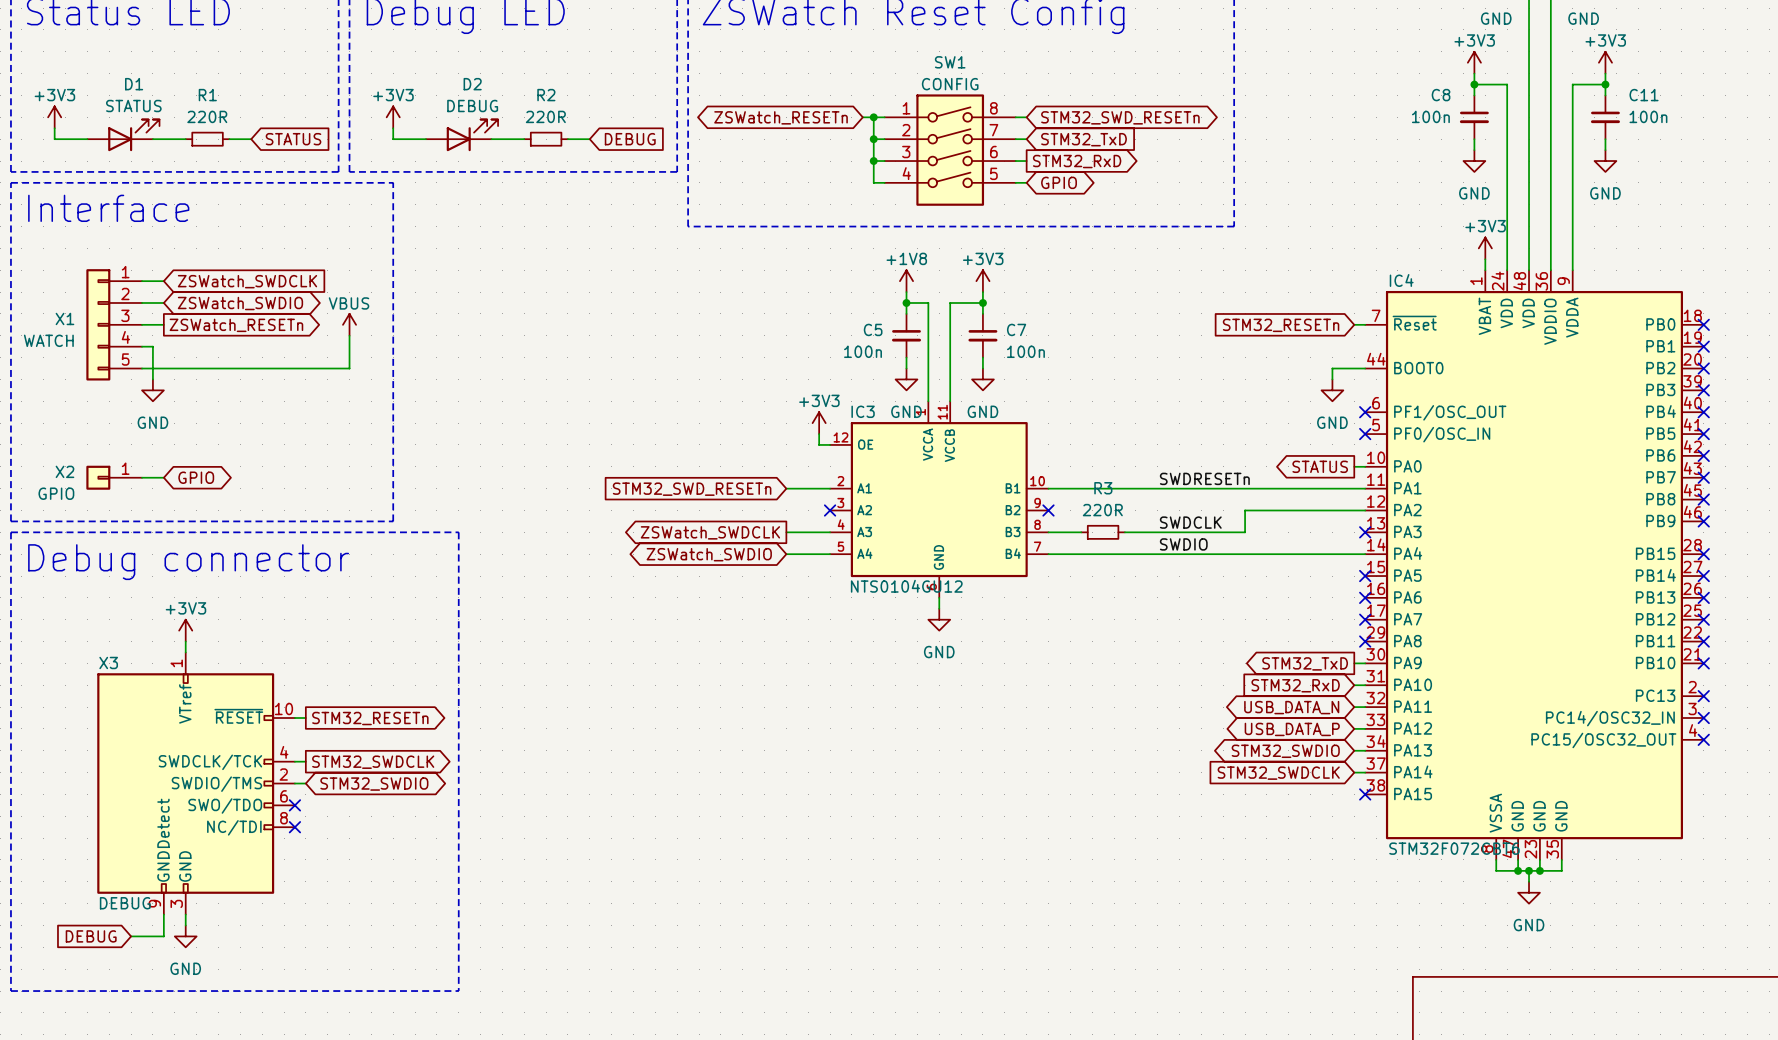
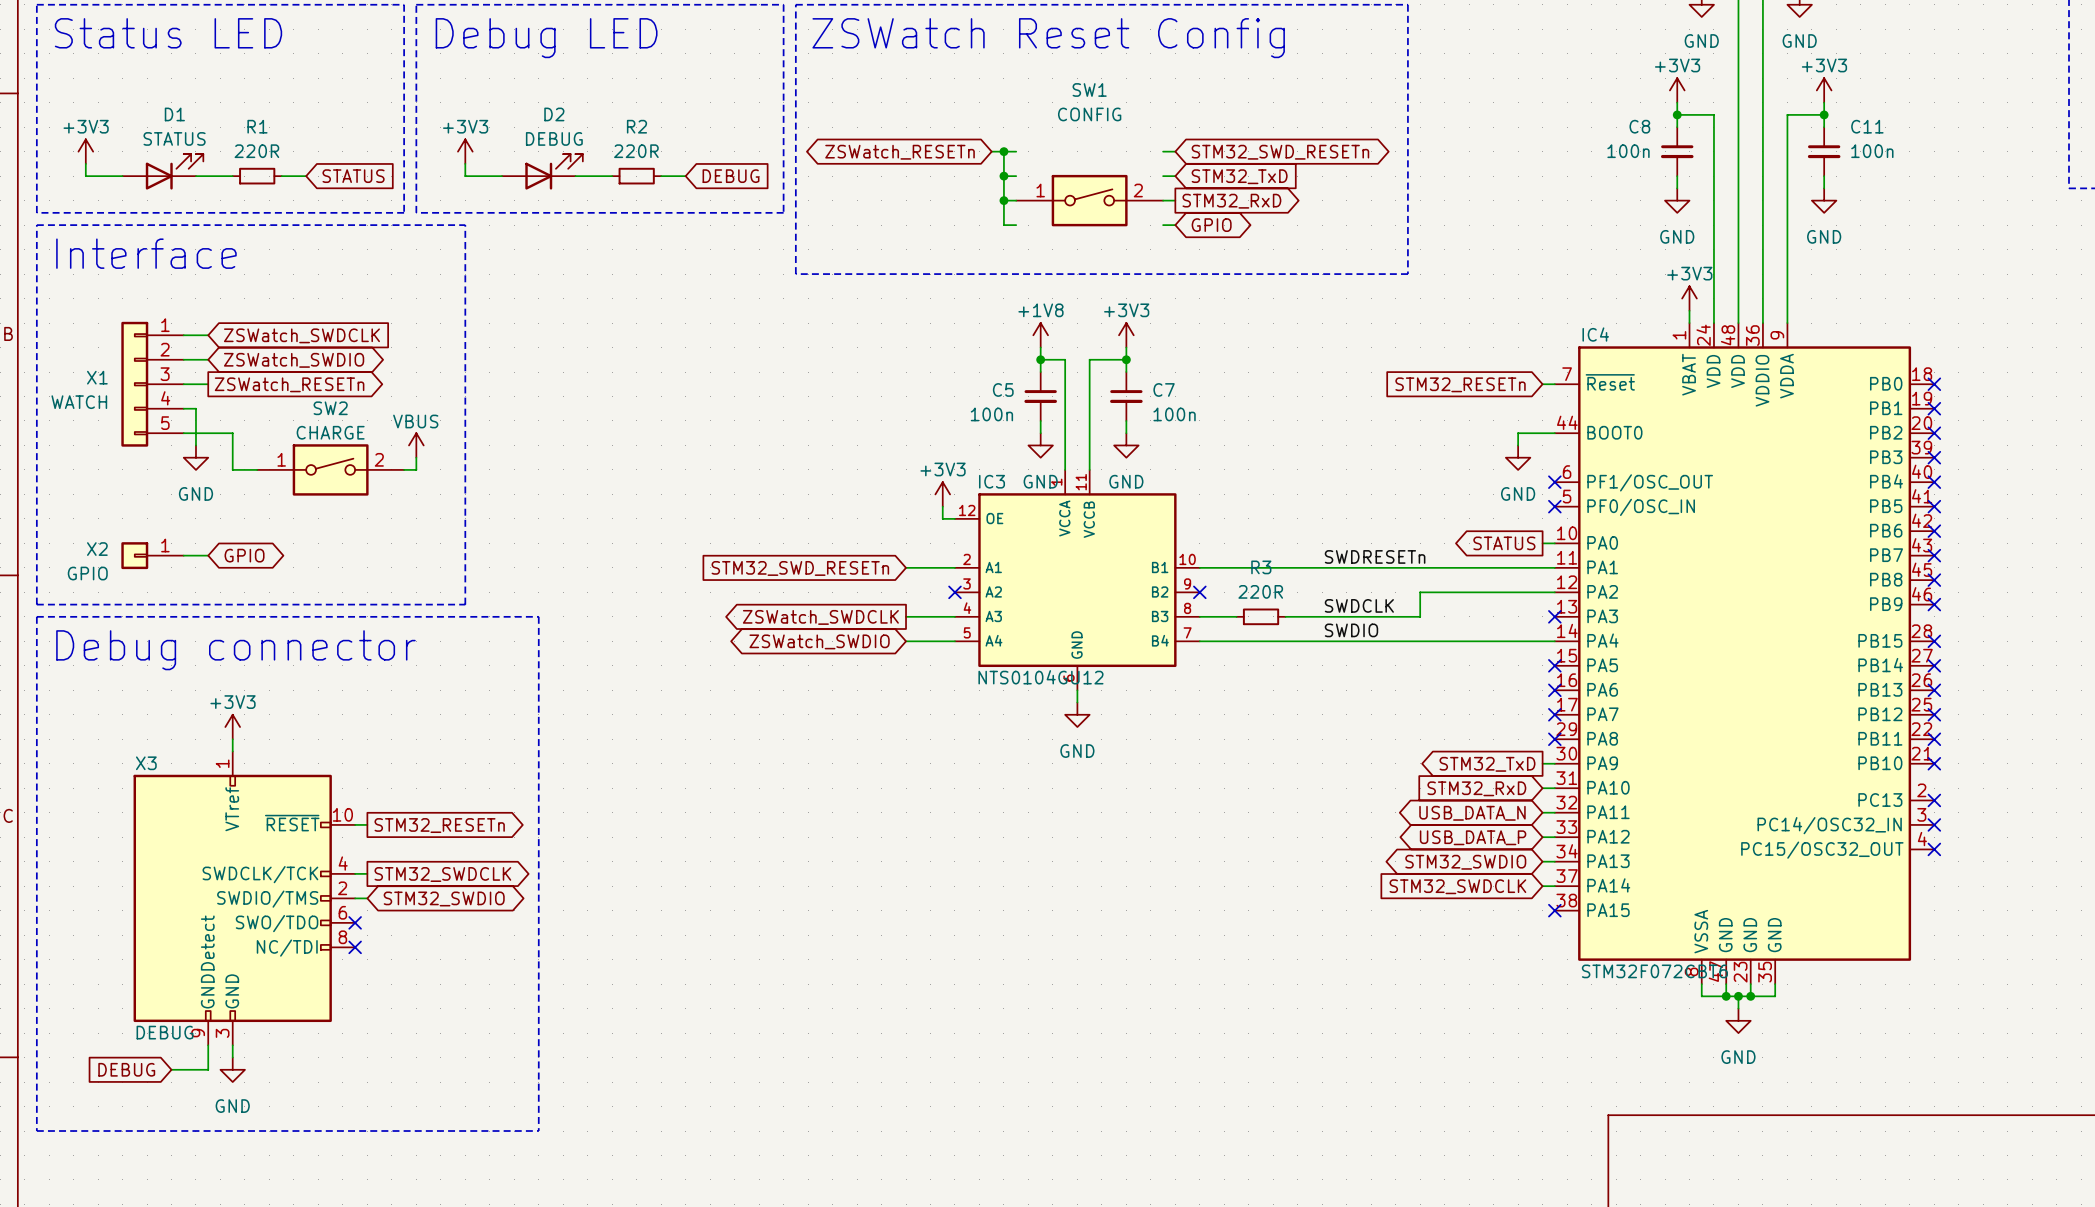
SW1 symbol: [884, 94, 1016, 206] -> [1016, 174, 1164, 227]
power symbol position: VBUS (349, 324) -> VBUS (416, 445)
wire: (349, 335) (349, 368) (185, 368) -> (257, 469) (232, 469) (232, 433)
wire: none -> (416, 457) (416, 469) (404, 469)
SW2: none -> CHARGE (330, 469)

